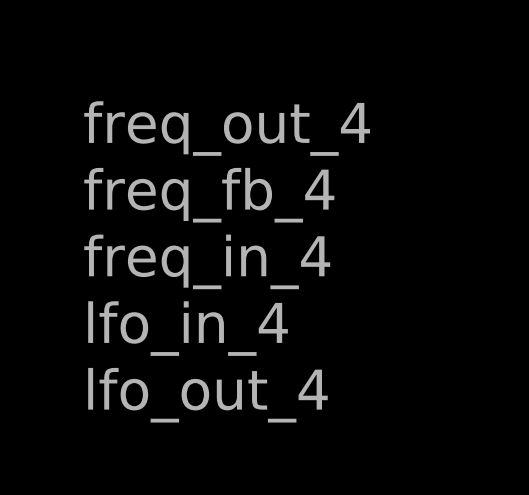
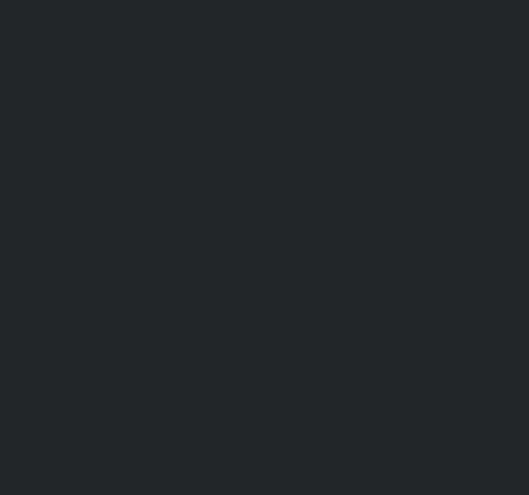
label: freq_out_4 (227, 128) -> none
label: freq_fb_4 (209, 195) -> none
label: freq_in_4 (207, 261) -> none
label: lfo_in_4 (188, 328) -> none
label: lfo_out_4 (207, 395) -> none

